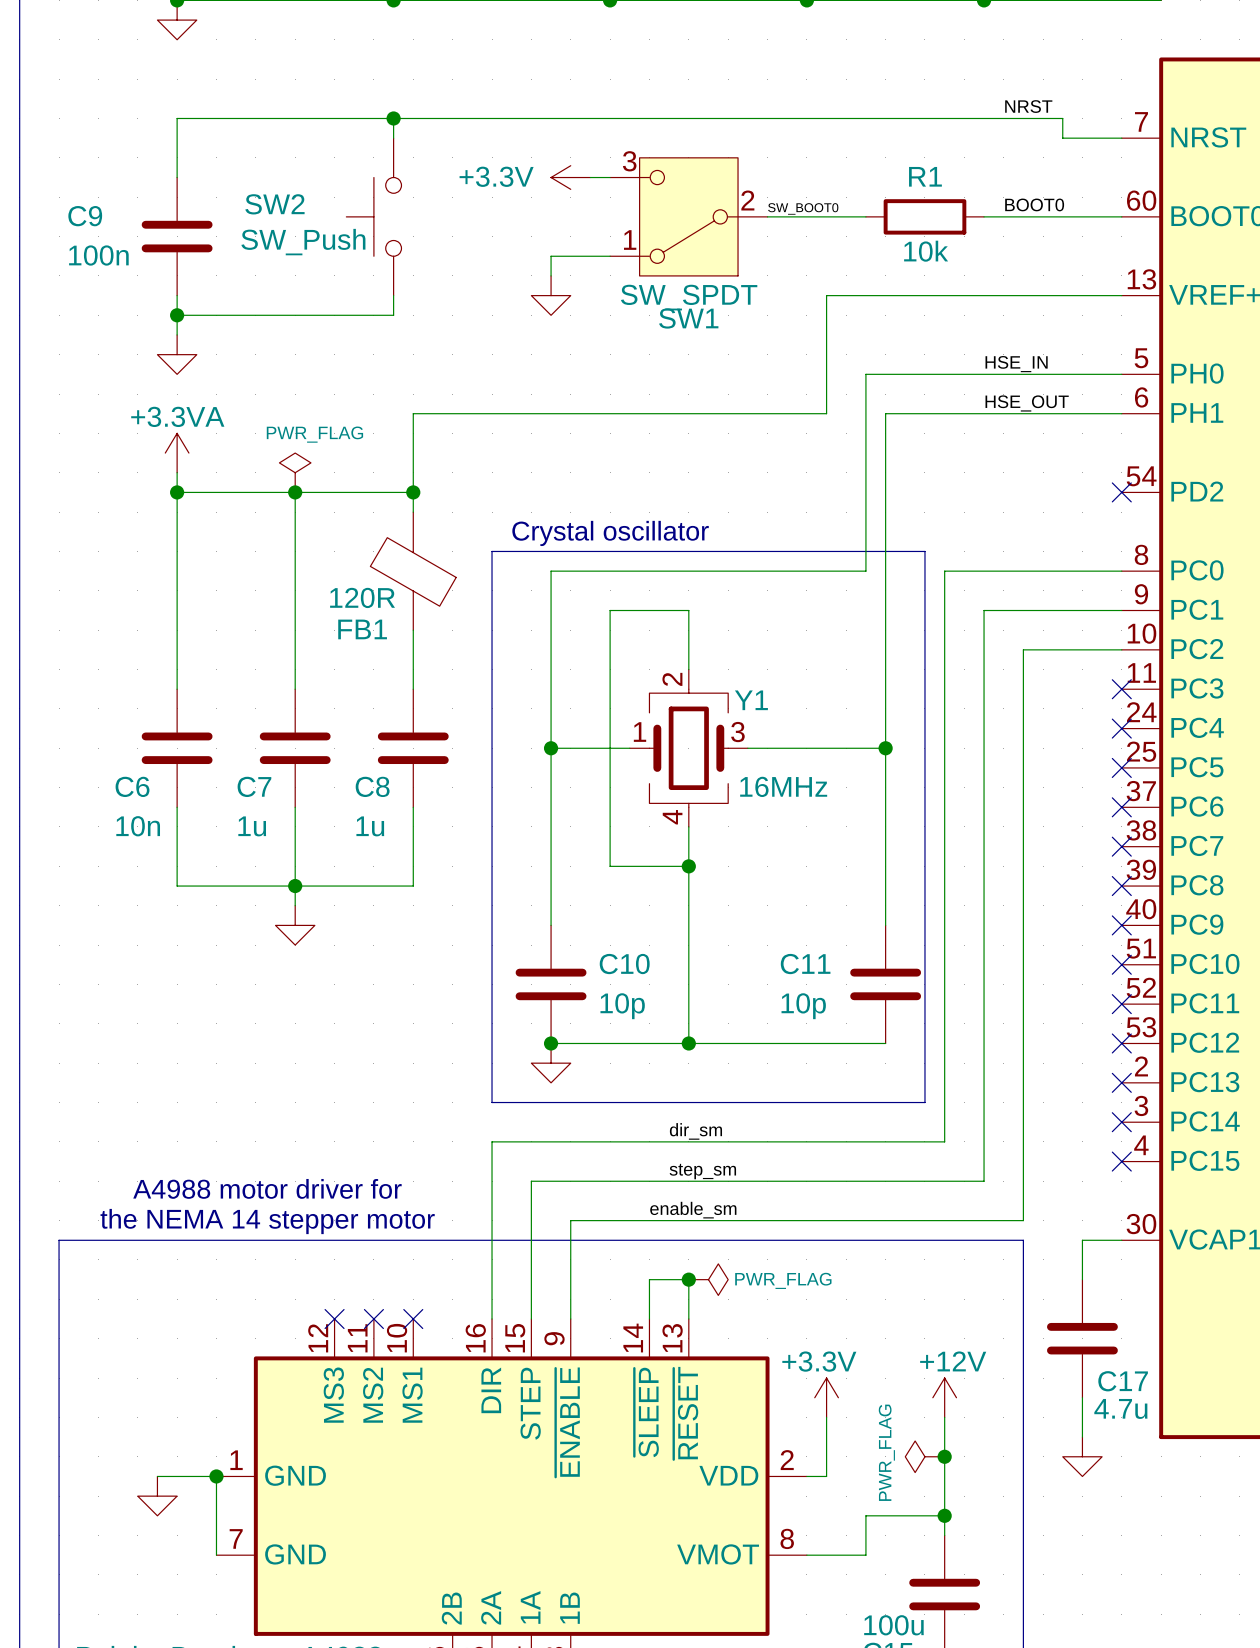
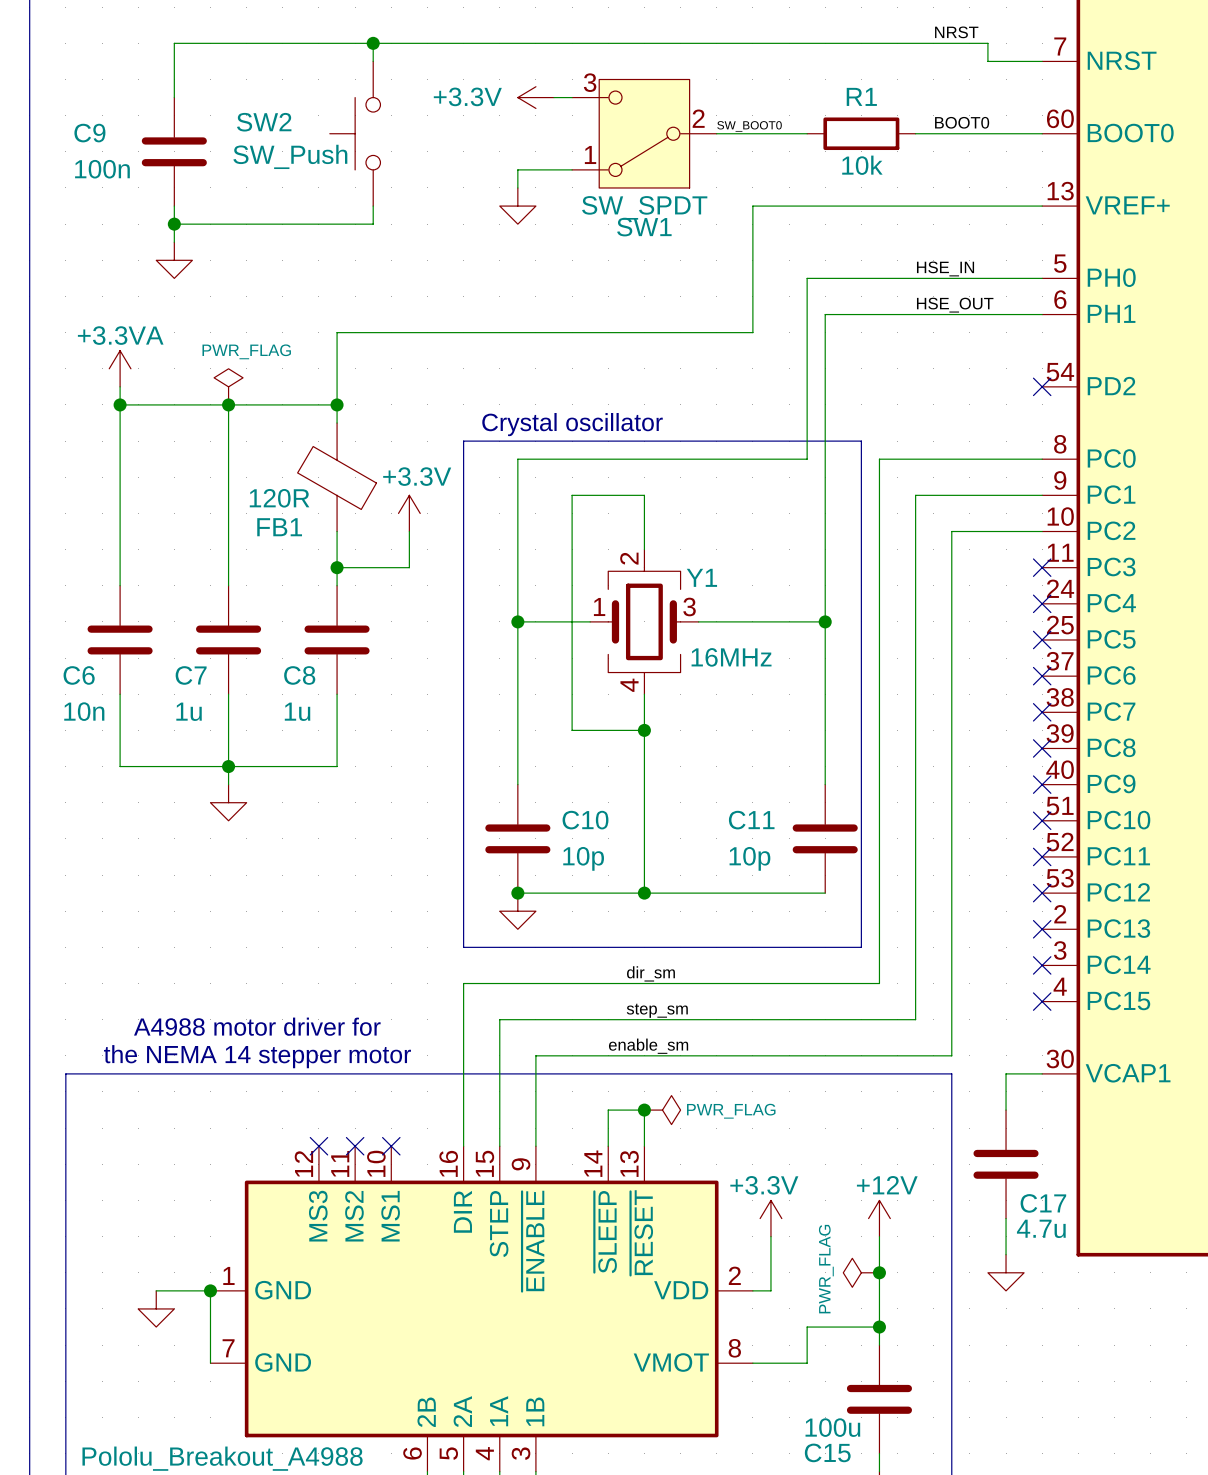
wire: (826, 295) (826, 413) (413, 413) (413, 512) -> (770, 206) (752, 206) (752, 332) (337, 332) (337, 423)
power symbol position: +3.3VA (177, 453) -> +3.3VA (120, 368)
wire: (177, 472) (177, 689) -> (120, 386) (120, 585)
power symbol position: PWR_FLAG (295, 472) -> PWR_FLAG (228, 386)
wire: (177, 492) (413, 492) -> (120, 404) (337, 404)
junction: (177, 492) -> none
wire: (295, 492) (295, 689) -> (228, 404) (228, 585)
junction: (295, 492) -> none
junction: (413, 492) -> none
junction: none -> (120, 404)
junction: none -> (228, 404)
junction: none -> (337, 404)
FB1 position: (413, 571) -> (337, 477)
FB1 value position: 120R (362, 597) -> 120R (279, 498)
FB1 name position: FB1 (362, 629) -> FB1 (279, 527)
wire: (413, 630) (413, 689) -> (337, 531) (337, 585)
power symbol: none -> +3.3V (409, 513)
wire: none -> (409, 531) (409, 567) (337, 567)
junction: none -> (337, 567)
C6 position: (177, 748) -> (120, 639)
C7 position: (295, 748) -> (228, 639)
C8 position: (413, 748) -> (337, 639)
wire: (177, 807) (177, 886) (413, 886) (413, 807) -> (120, 694) (120, 766) (337, 766) (337, 694)
wire: (295, 807) (295, 905) -> (228, 694) (228, 784)
junction position: (295, 886) -> (228, 766)
power symbol position: (295, 925) -> (228, 802)

